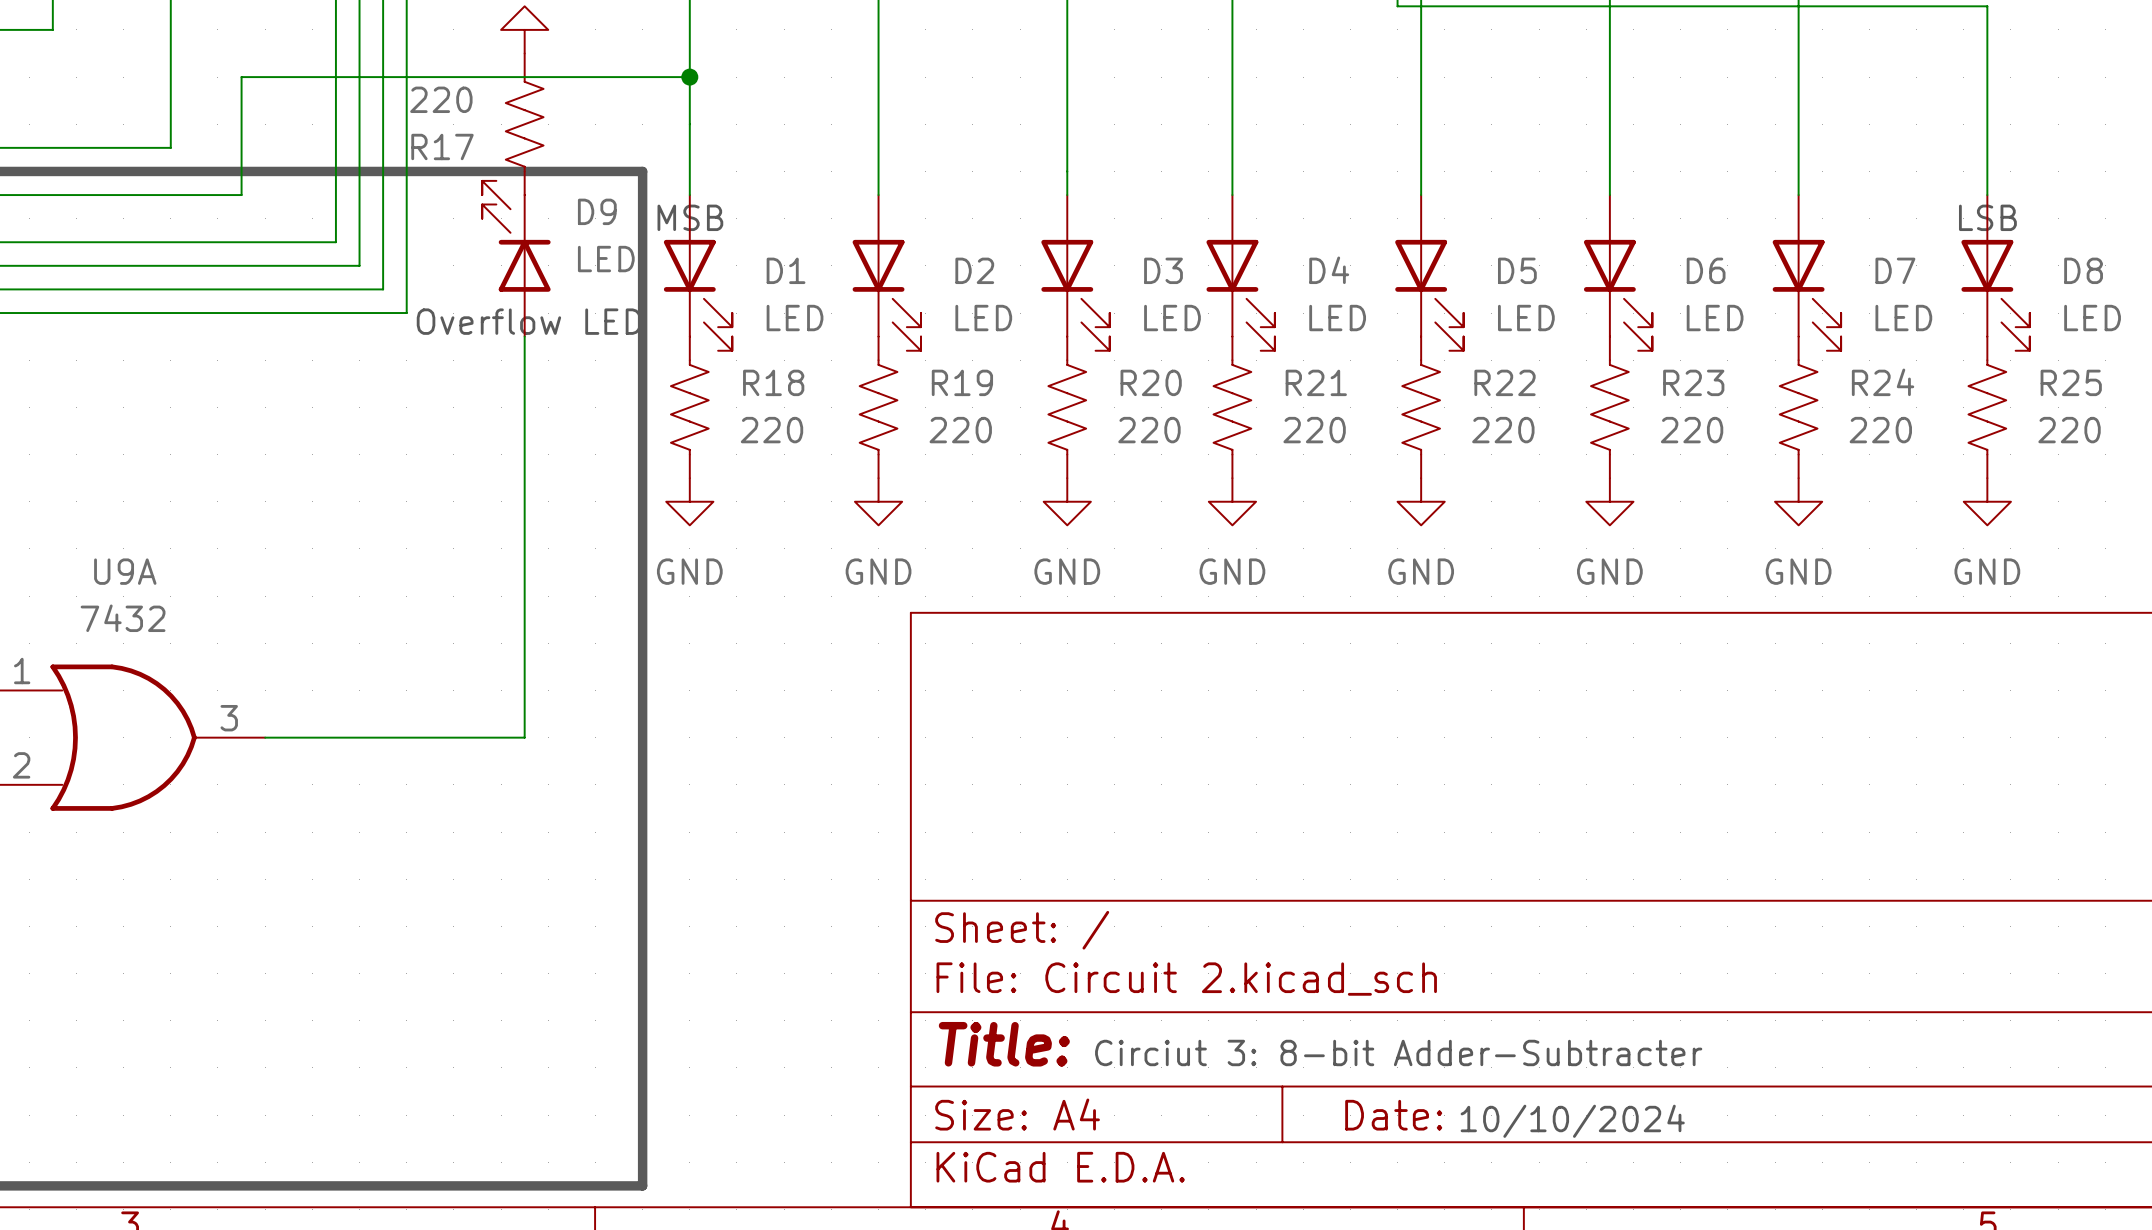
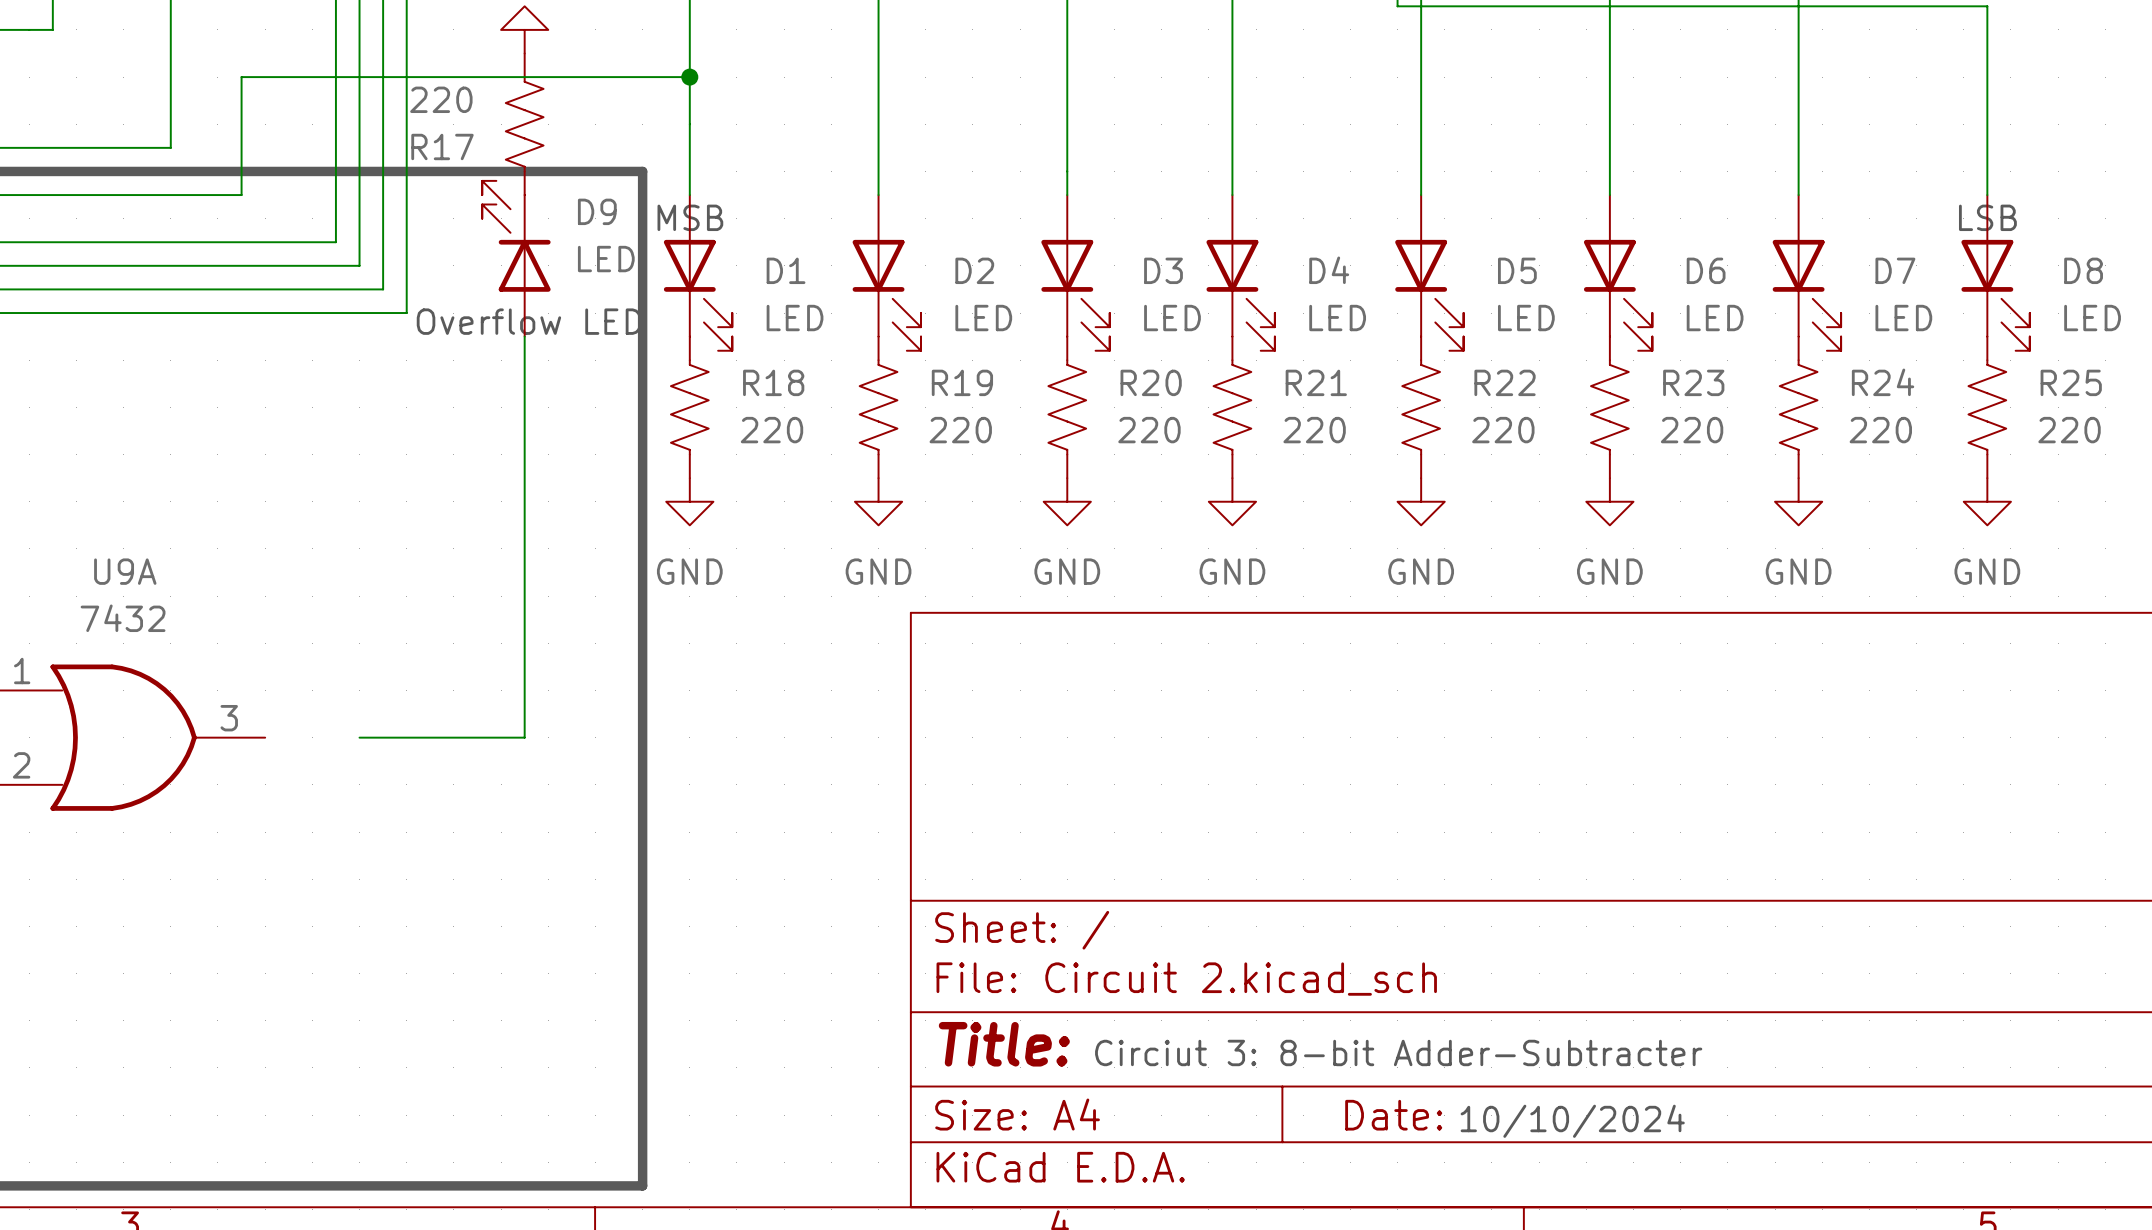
wire: (265, 737) (359, 737) -> none

